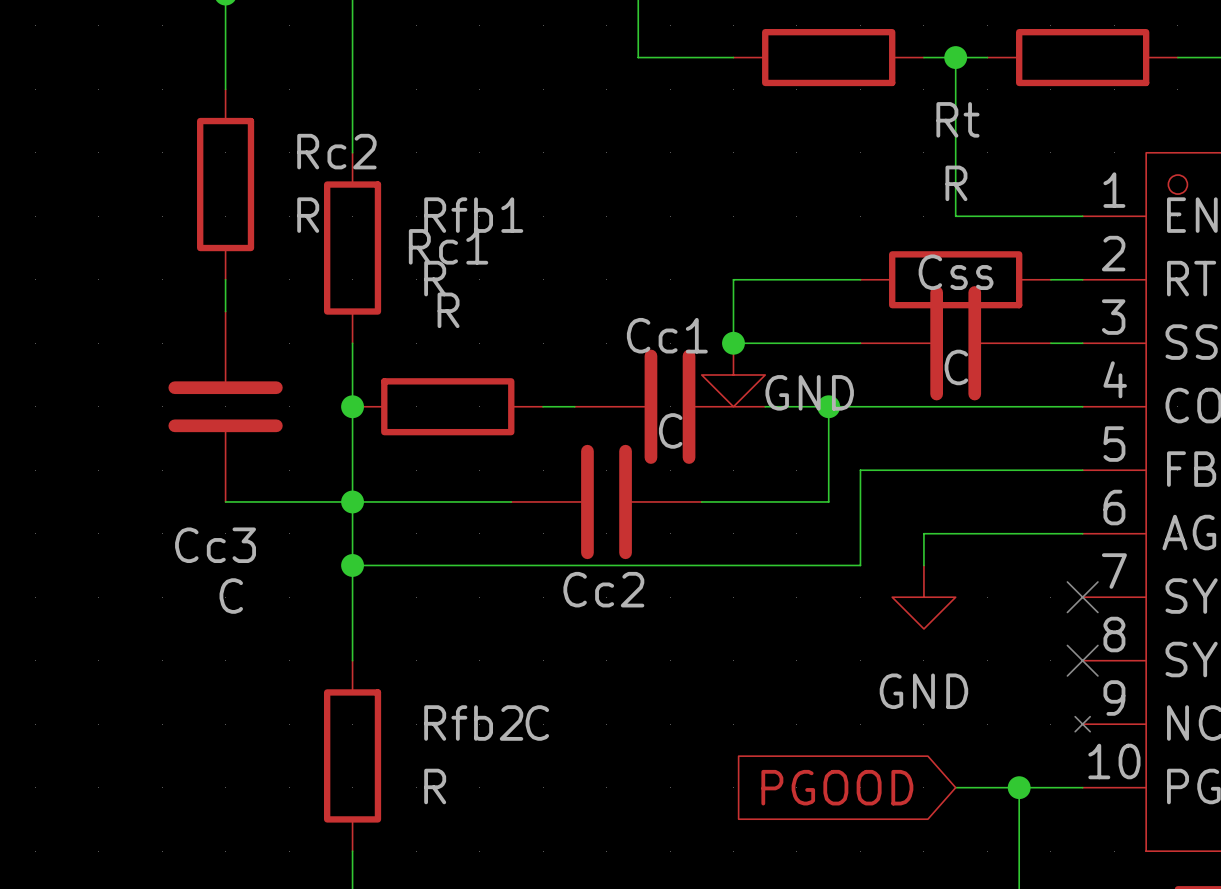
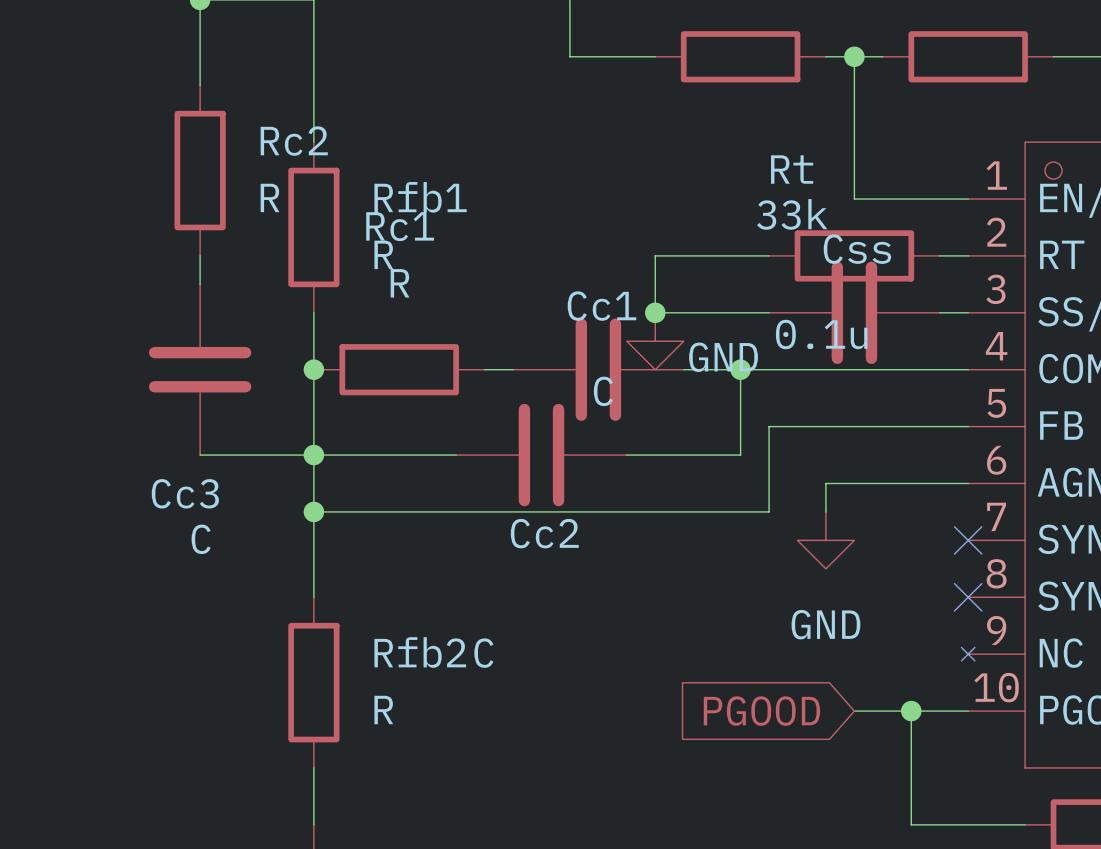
Rt name position: Rt (957, 119) -> Rt (792, 169)
Rt value: R (956, 183) -> 33k (792, 214)
Css value: C (956, 367) -> 0.1u (821, 334)

